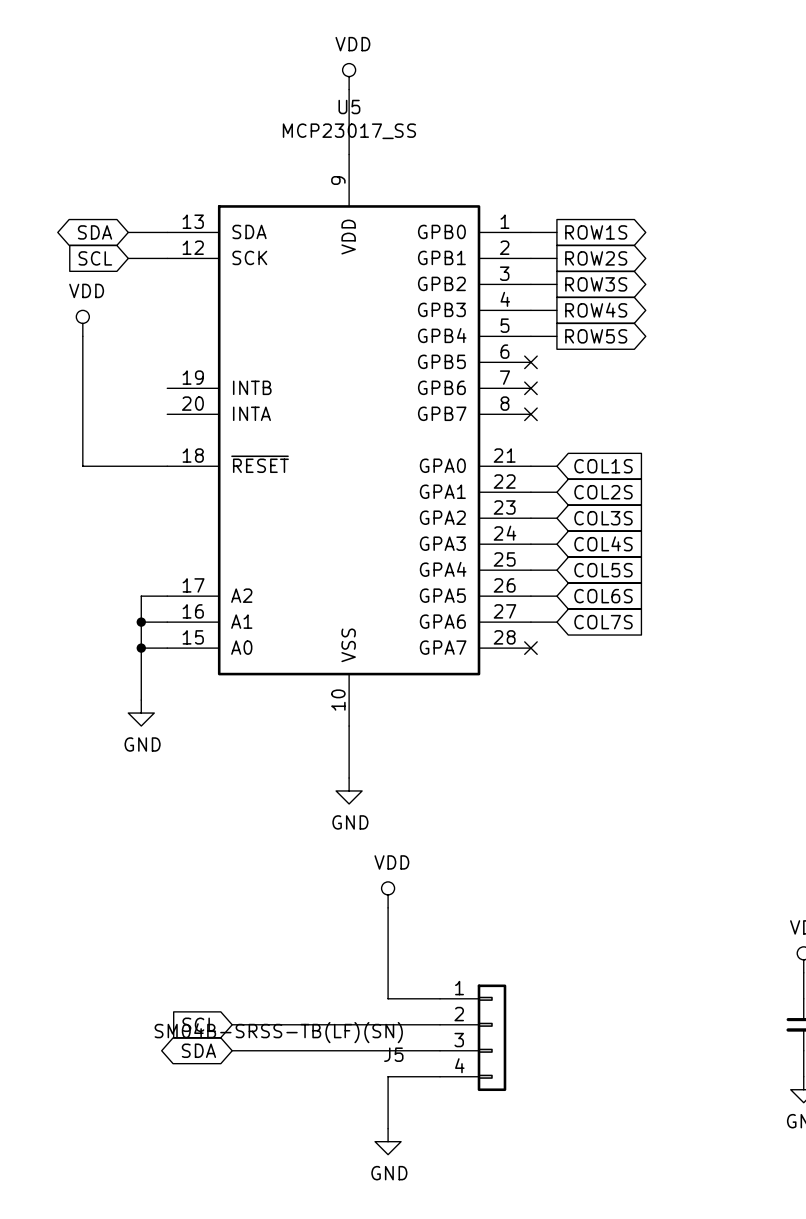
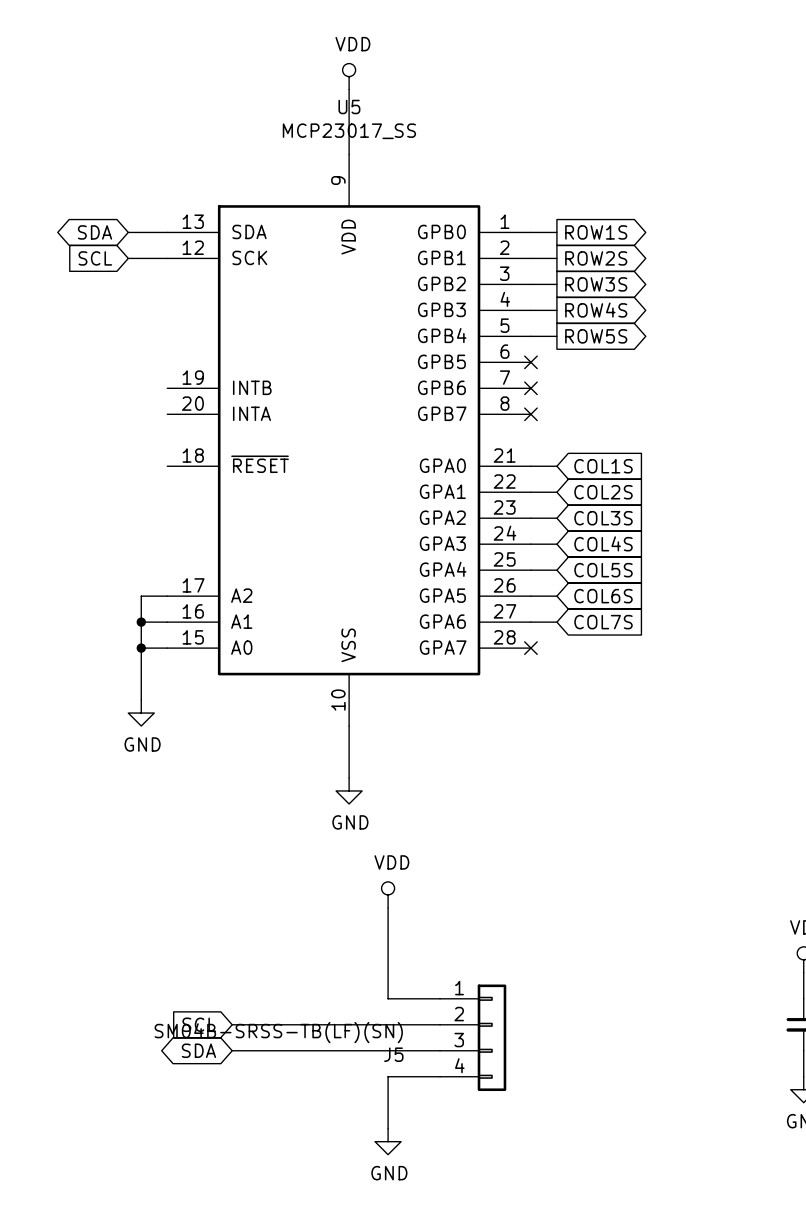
power symbol: VDD (82, 323) -> none
wire: (82, 336) (82, 466) (167, 466) -> none

